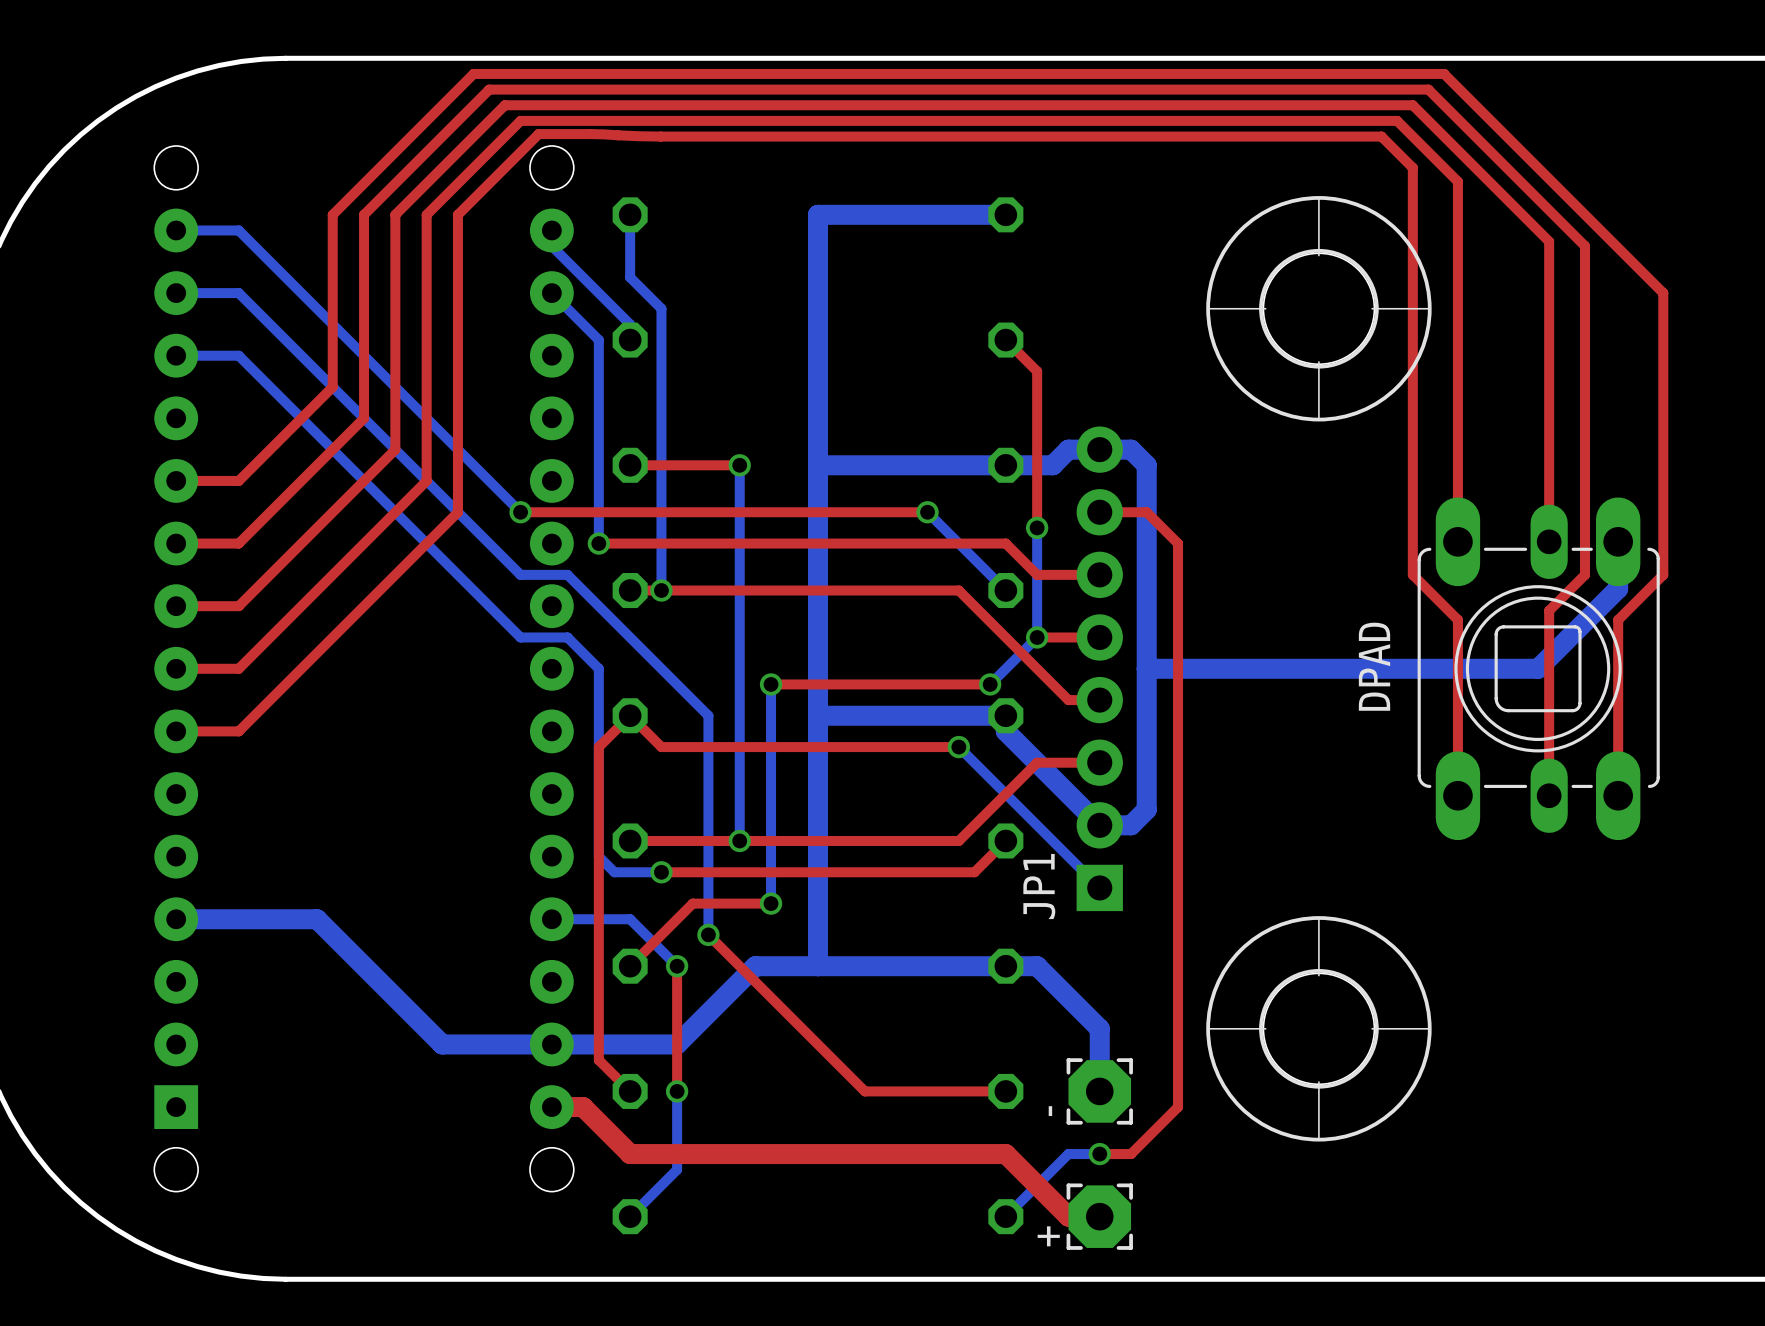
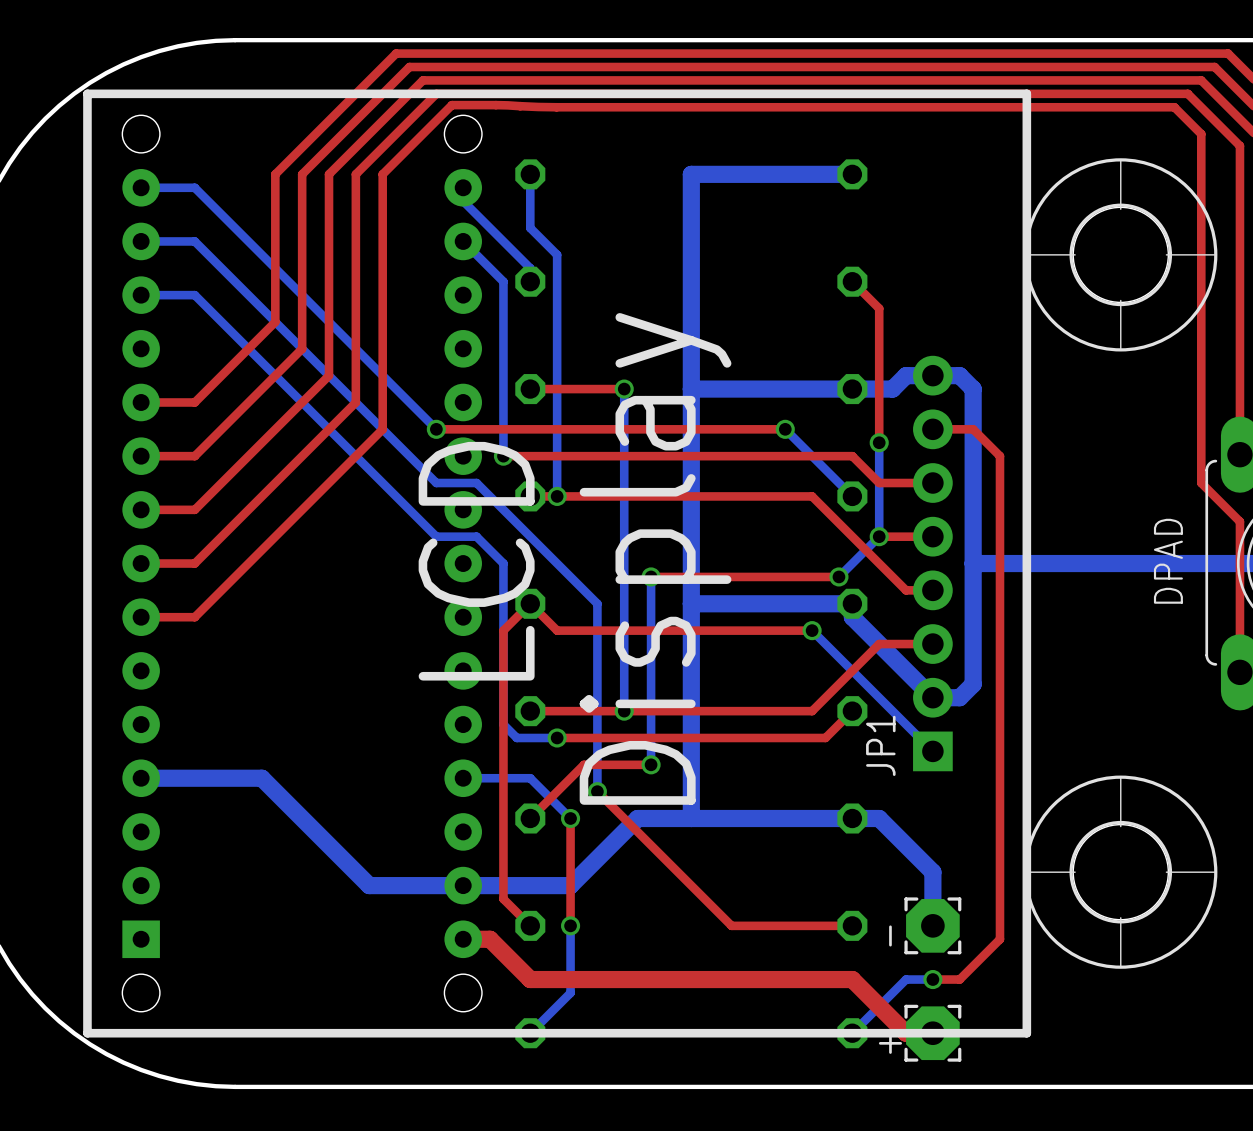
line: none -> (87, 93) (87, 1033) (1026, 1033) (1026, 93) (87, 93)
text: none -> LCD (476, 561)
text: none -> Display (655, 558)

